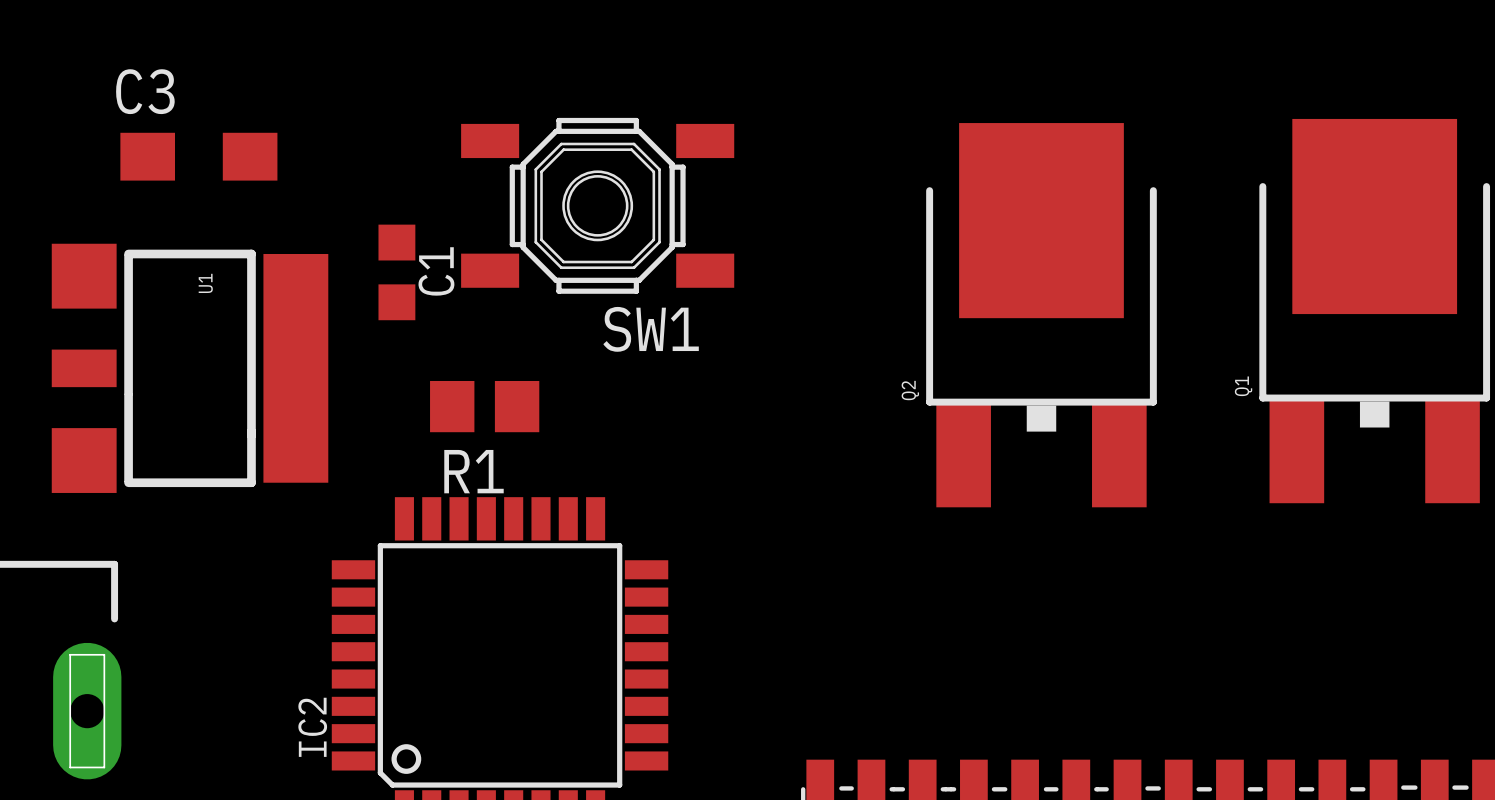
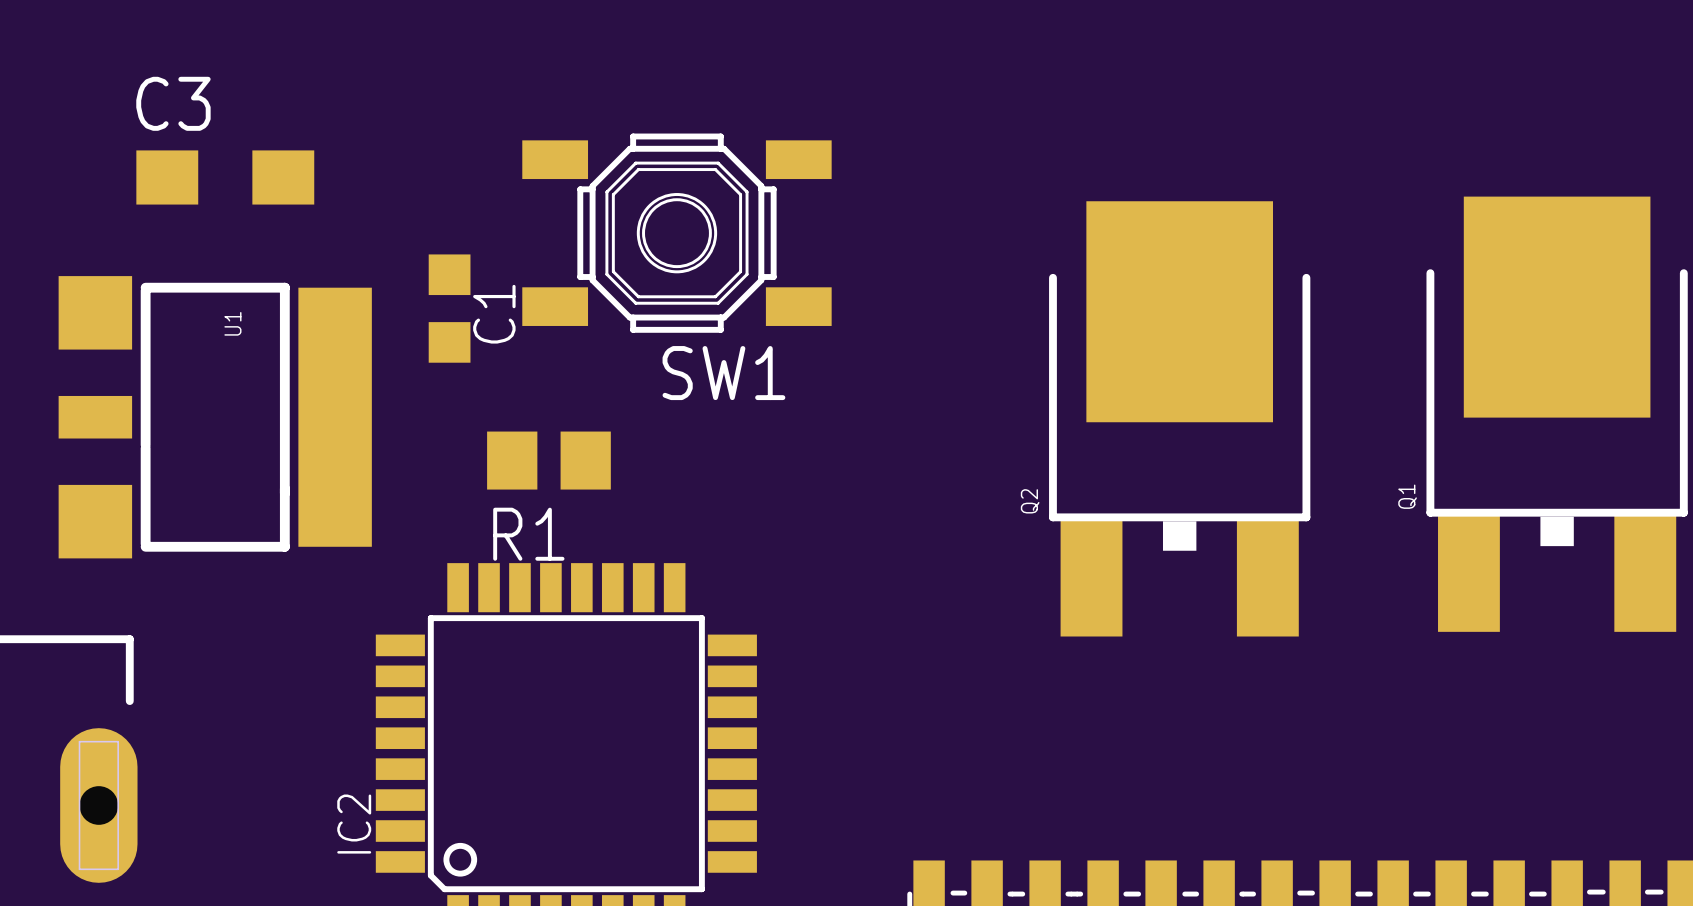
Q1 position: (1374, 311) -> (1557, 414)
Q2 position: (1041, 315) -> (1179, 418)

